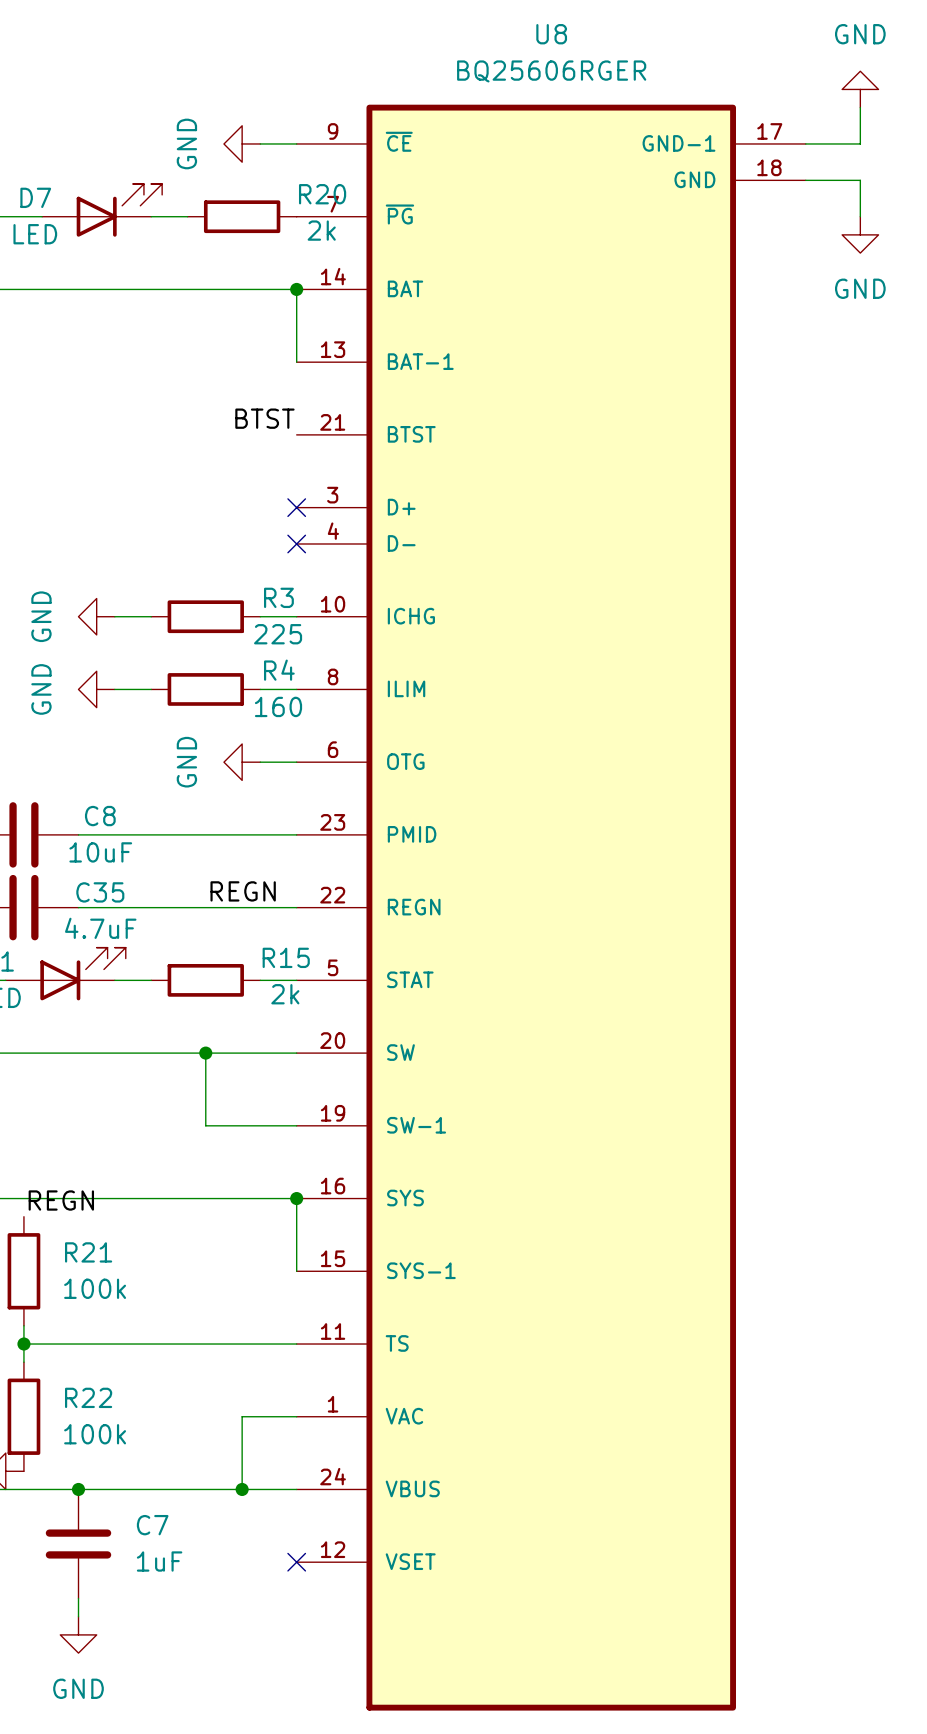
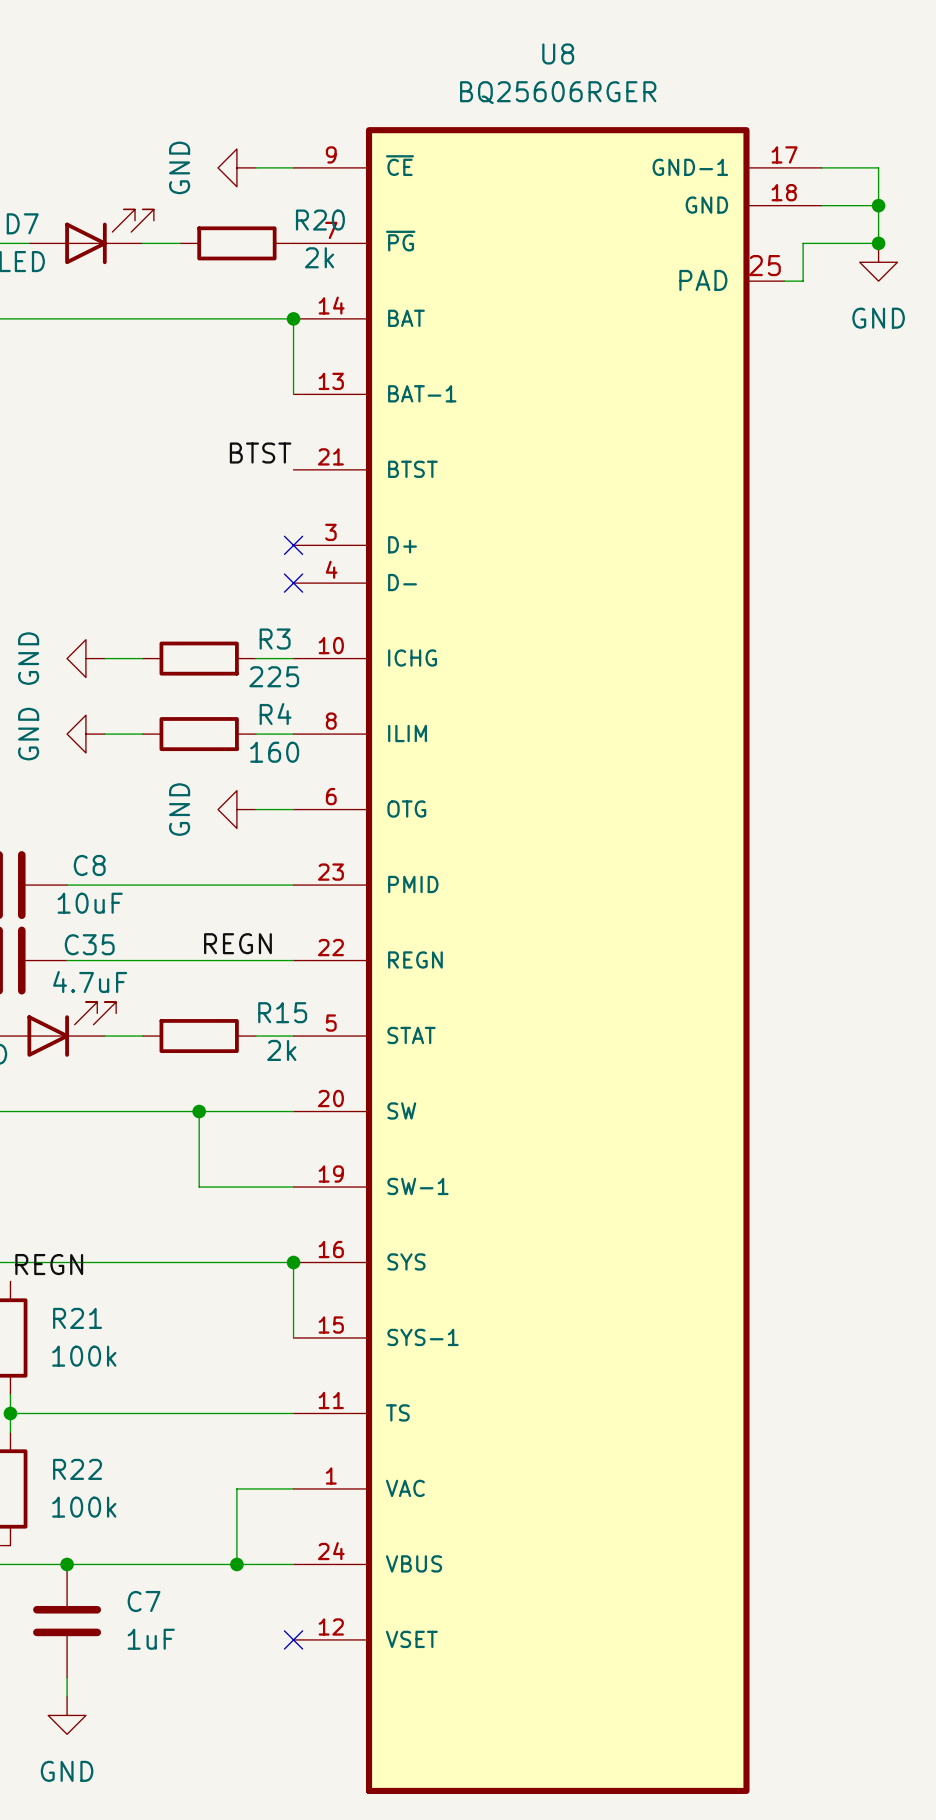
power symbol: GND (860, 89) -> none
U8 symbol: [296, 104, 806, 1711] -> [293, 127, 822, 1794]
wire: (860, 107) (860, 143) -> (878, 205) (878, 167)
junction: none -> (878, 205)
wire: none -> (878, 243) (803, 243) (803, 281) (784, 281)
junction: none -> (878, 243)

